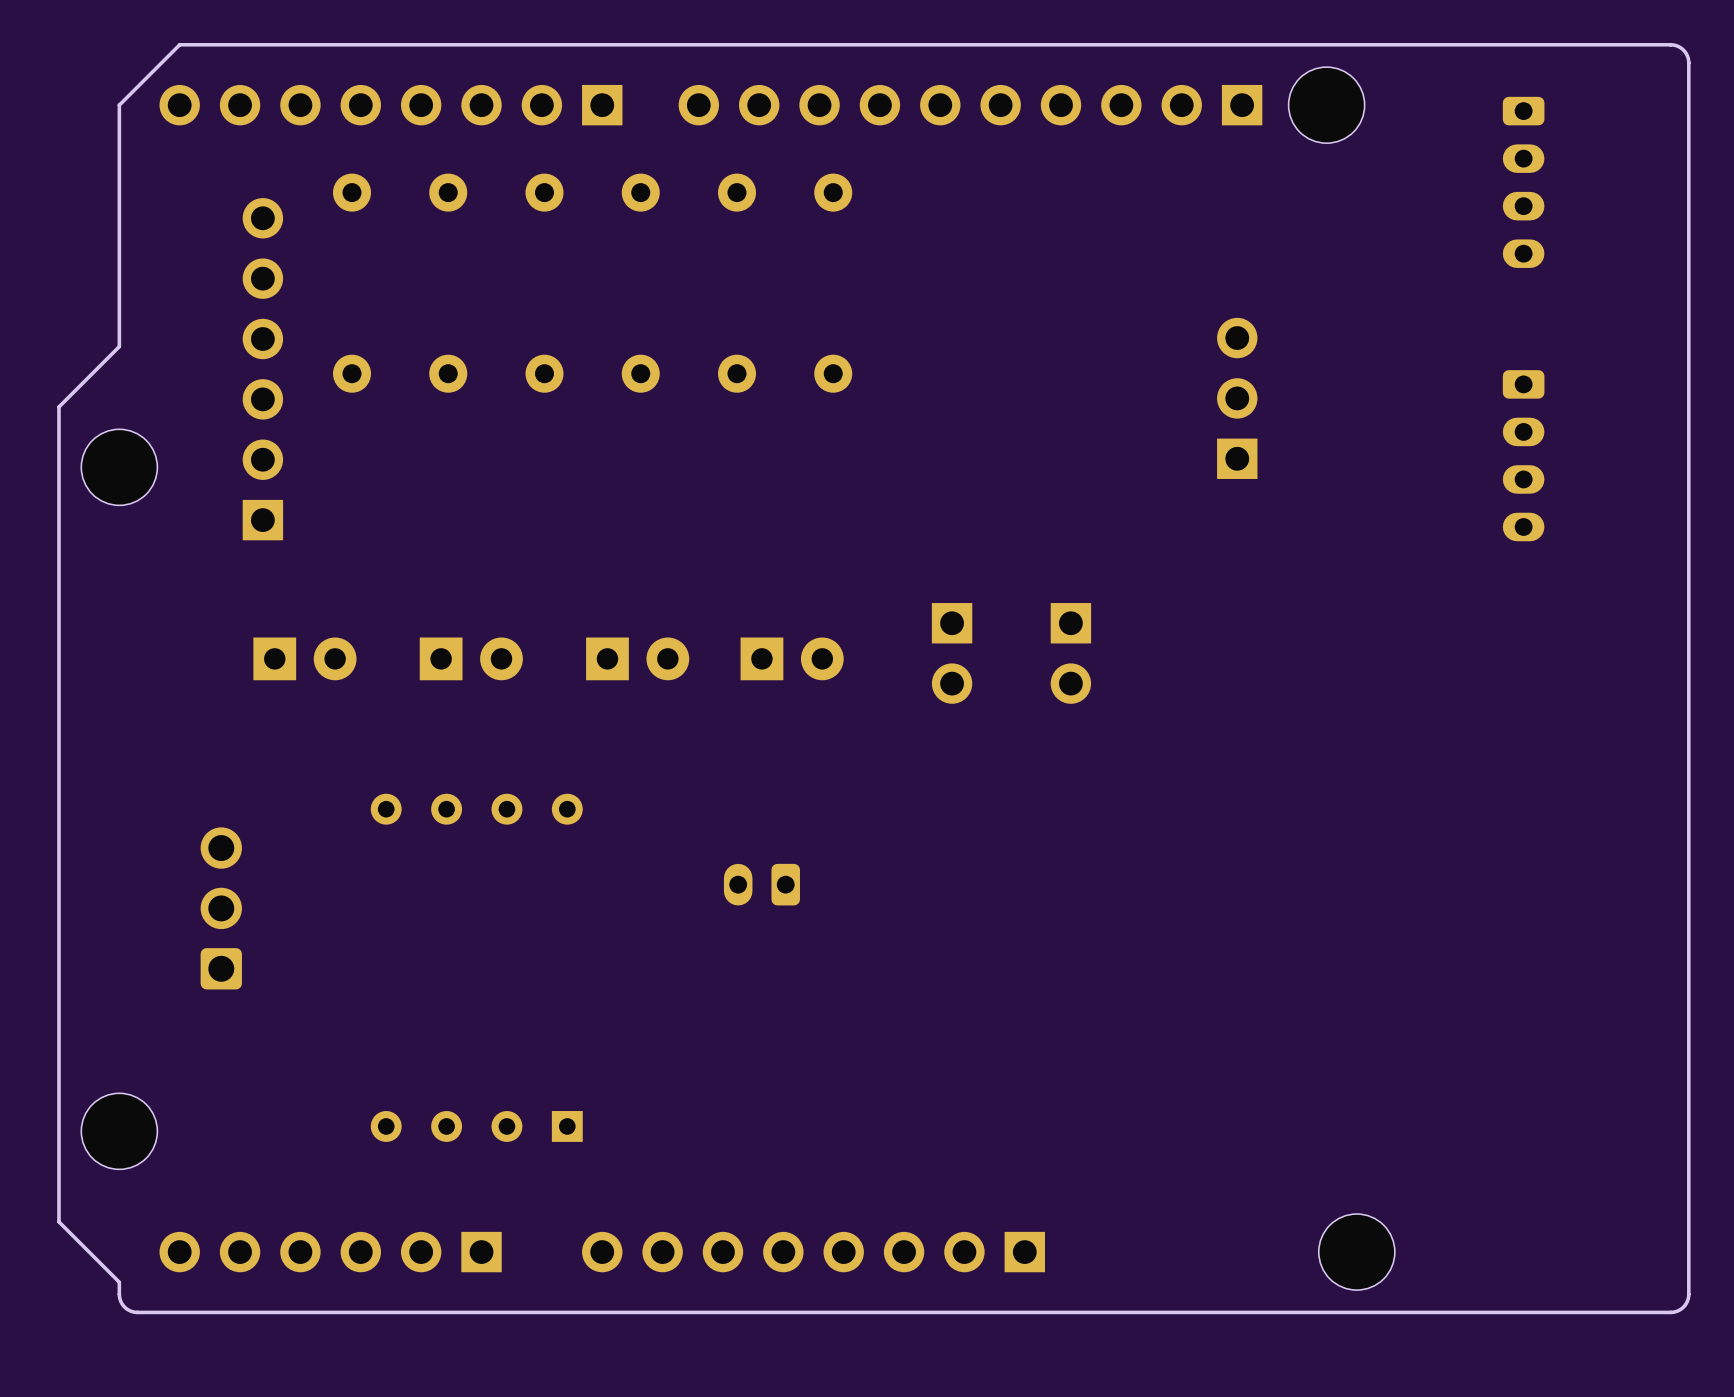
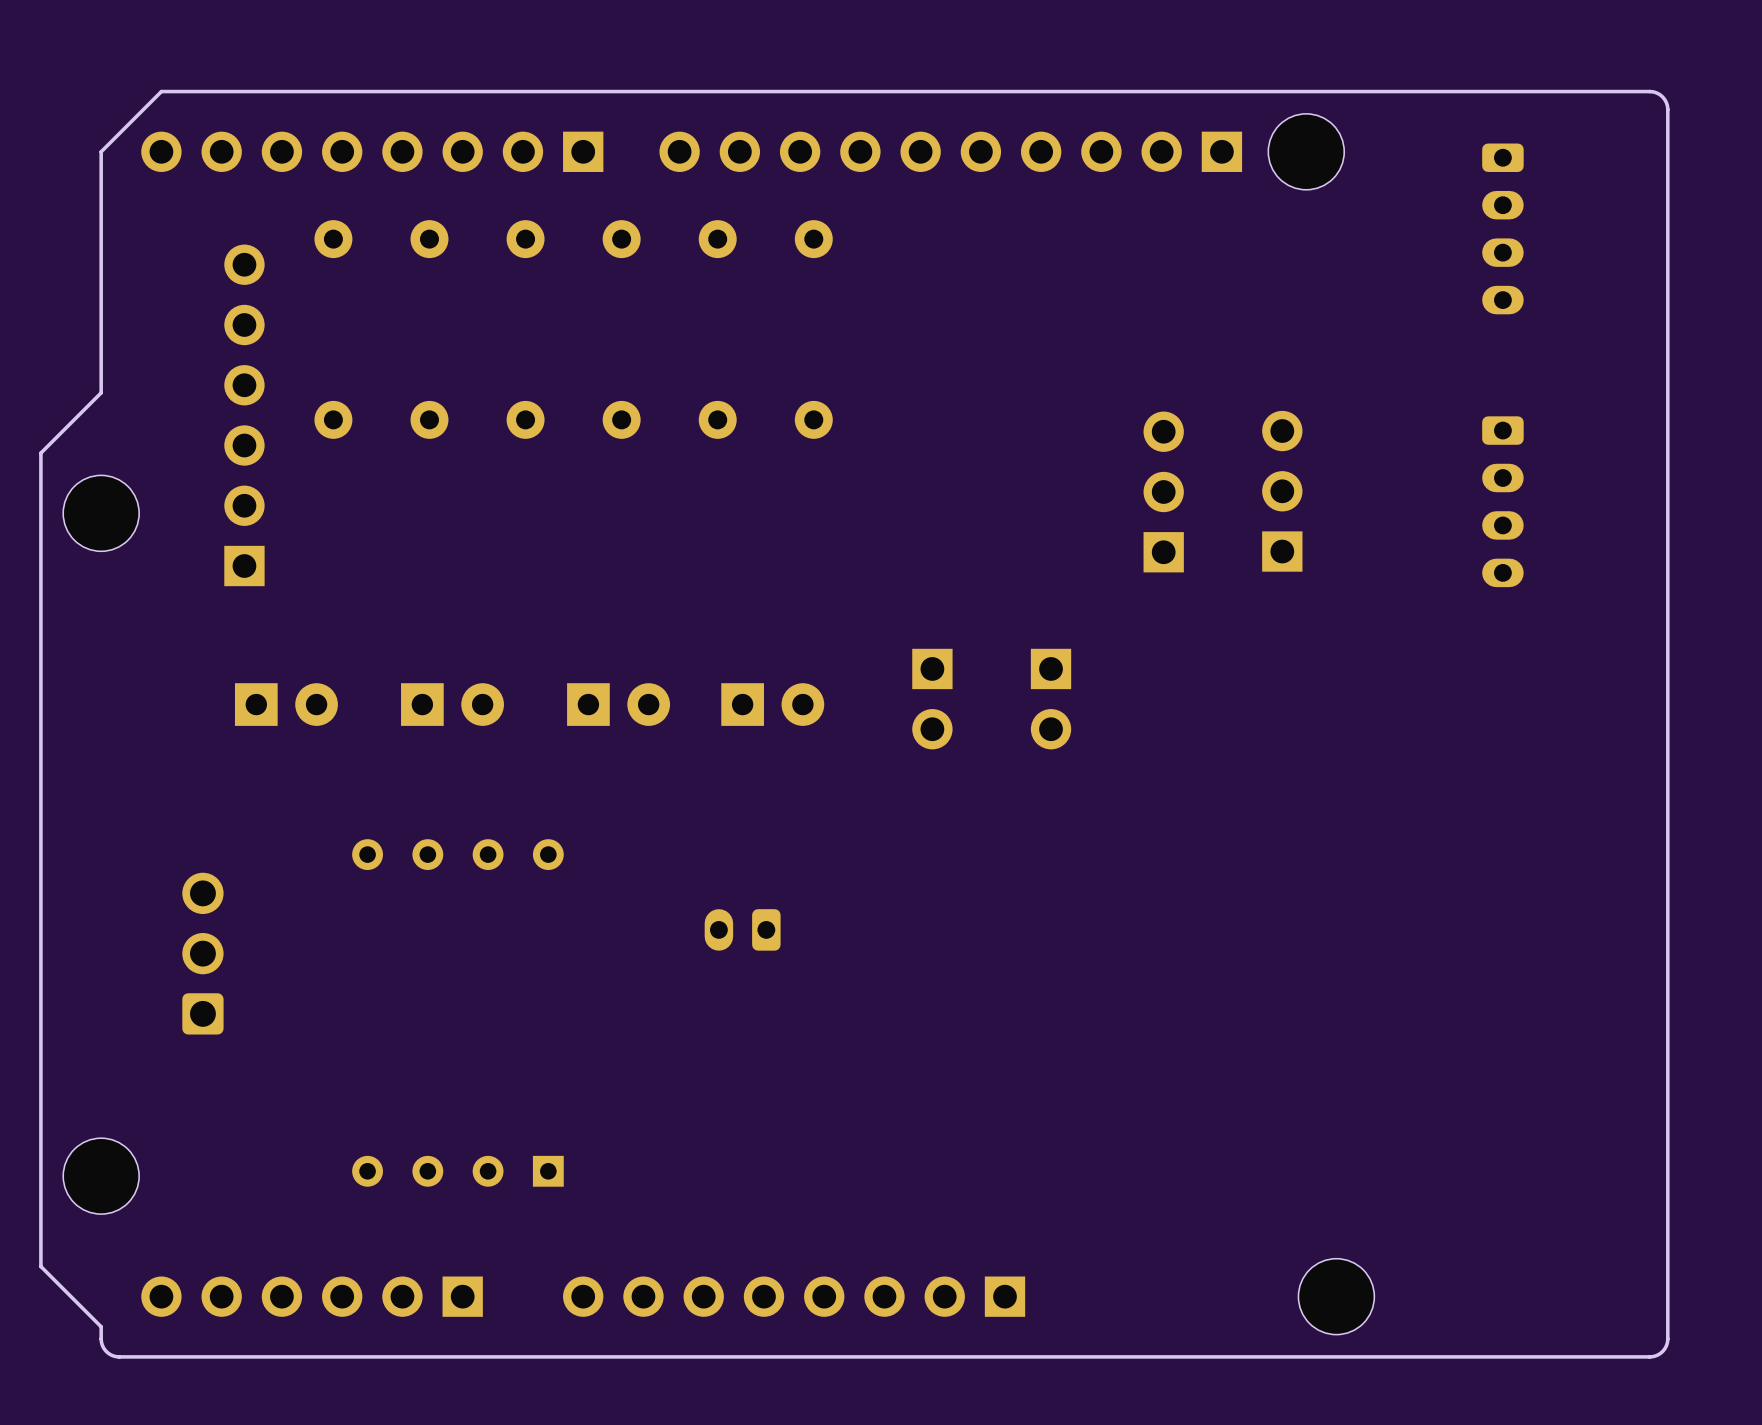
part: (1237, 398) -> none
part: none -> (1163, 491)
part: none -> (1282, 491)

